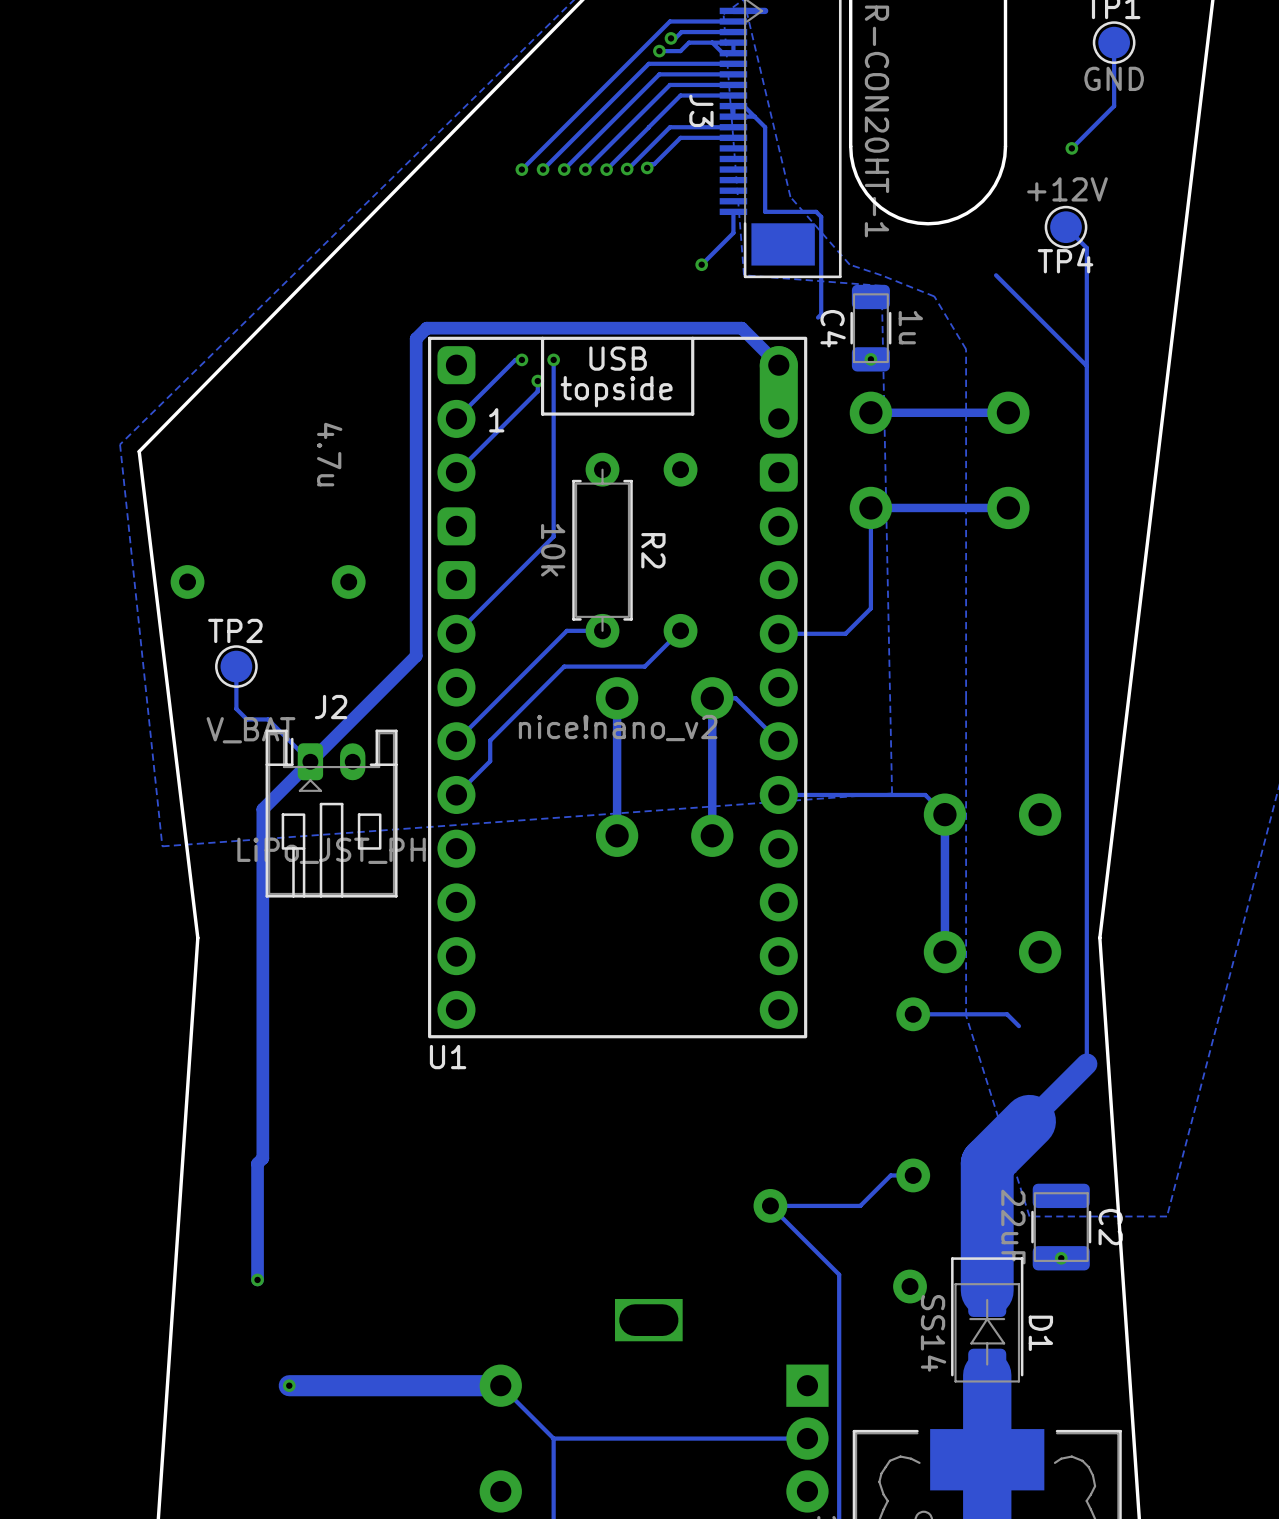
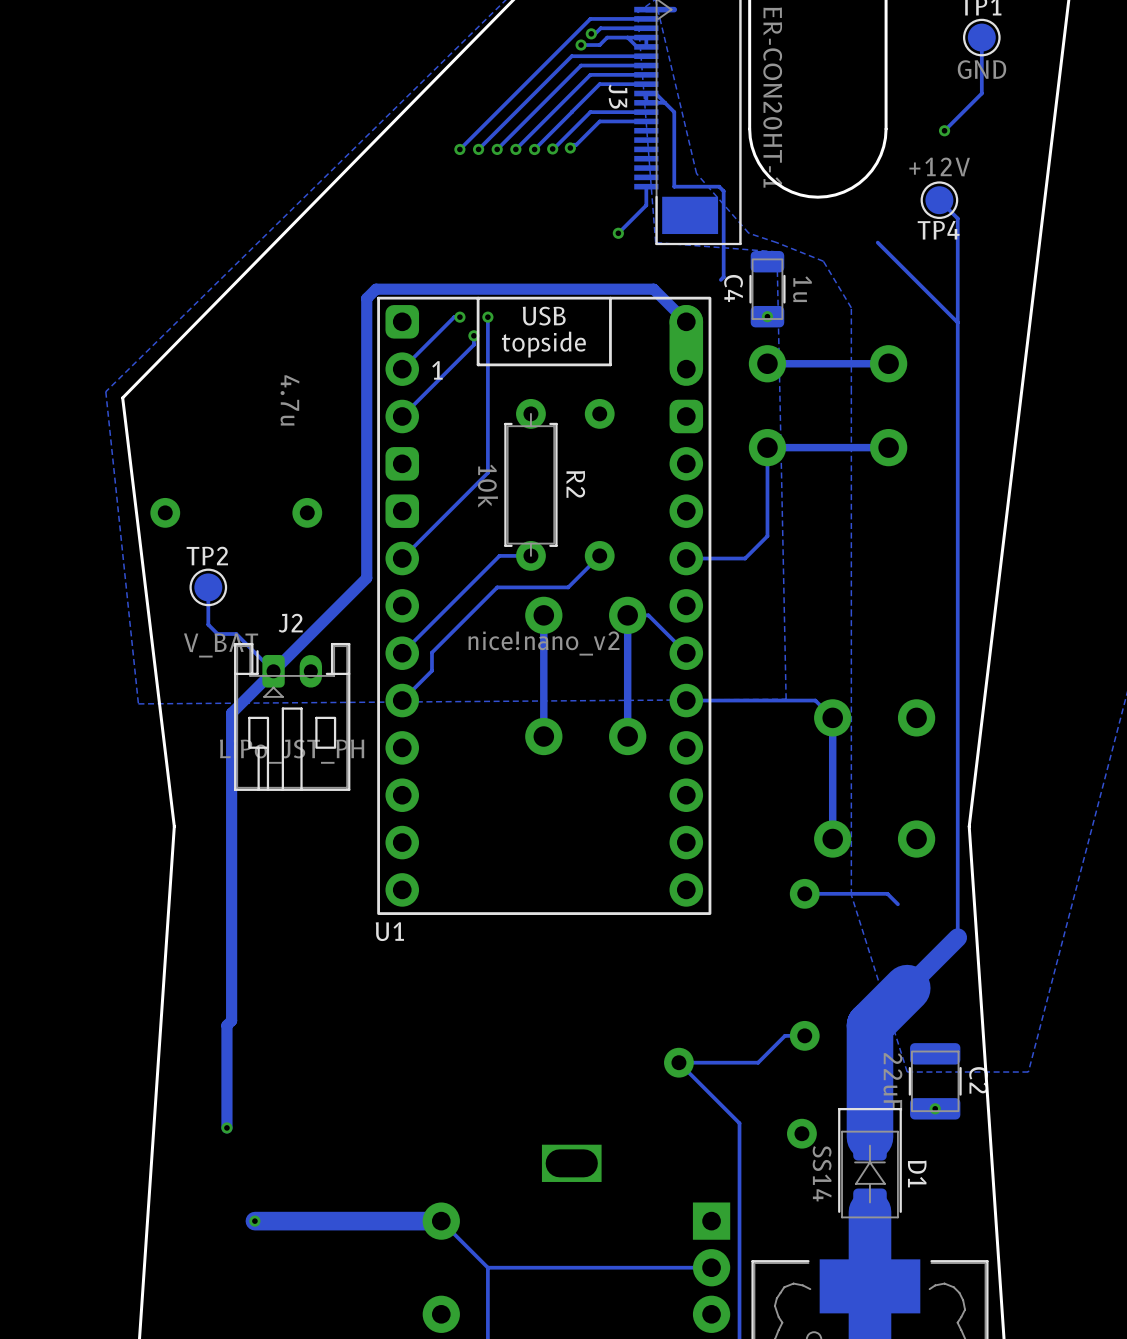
zone outline: (120, 444) (162, 846) (892, 793) -> (105, 391) (138, 703) (786, 699)

